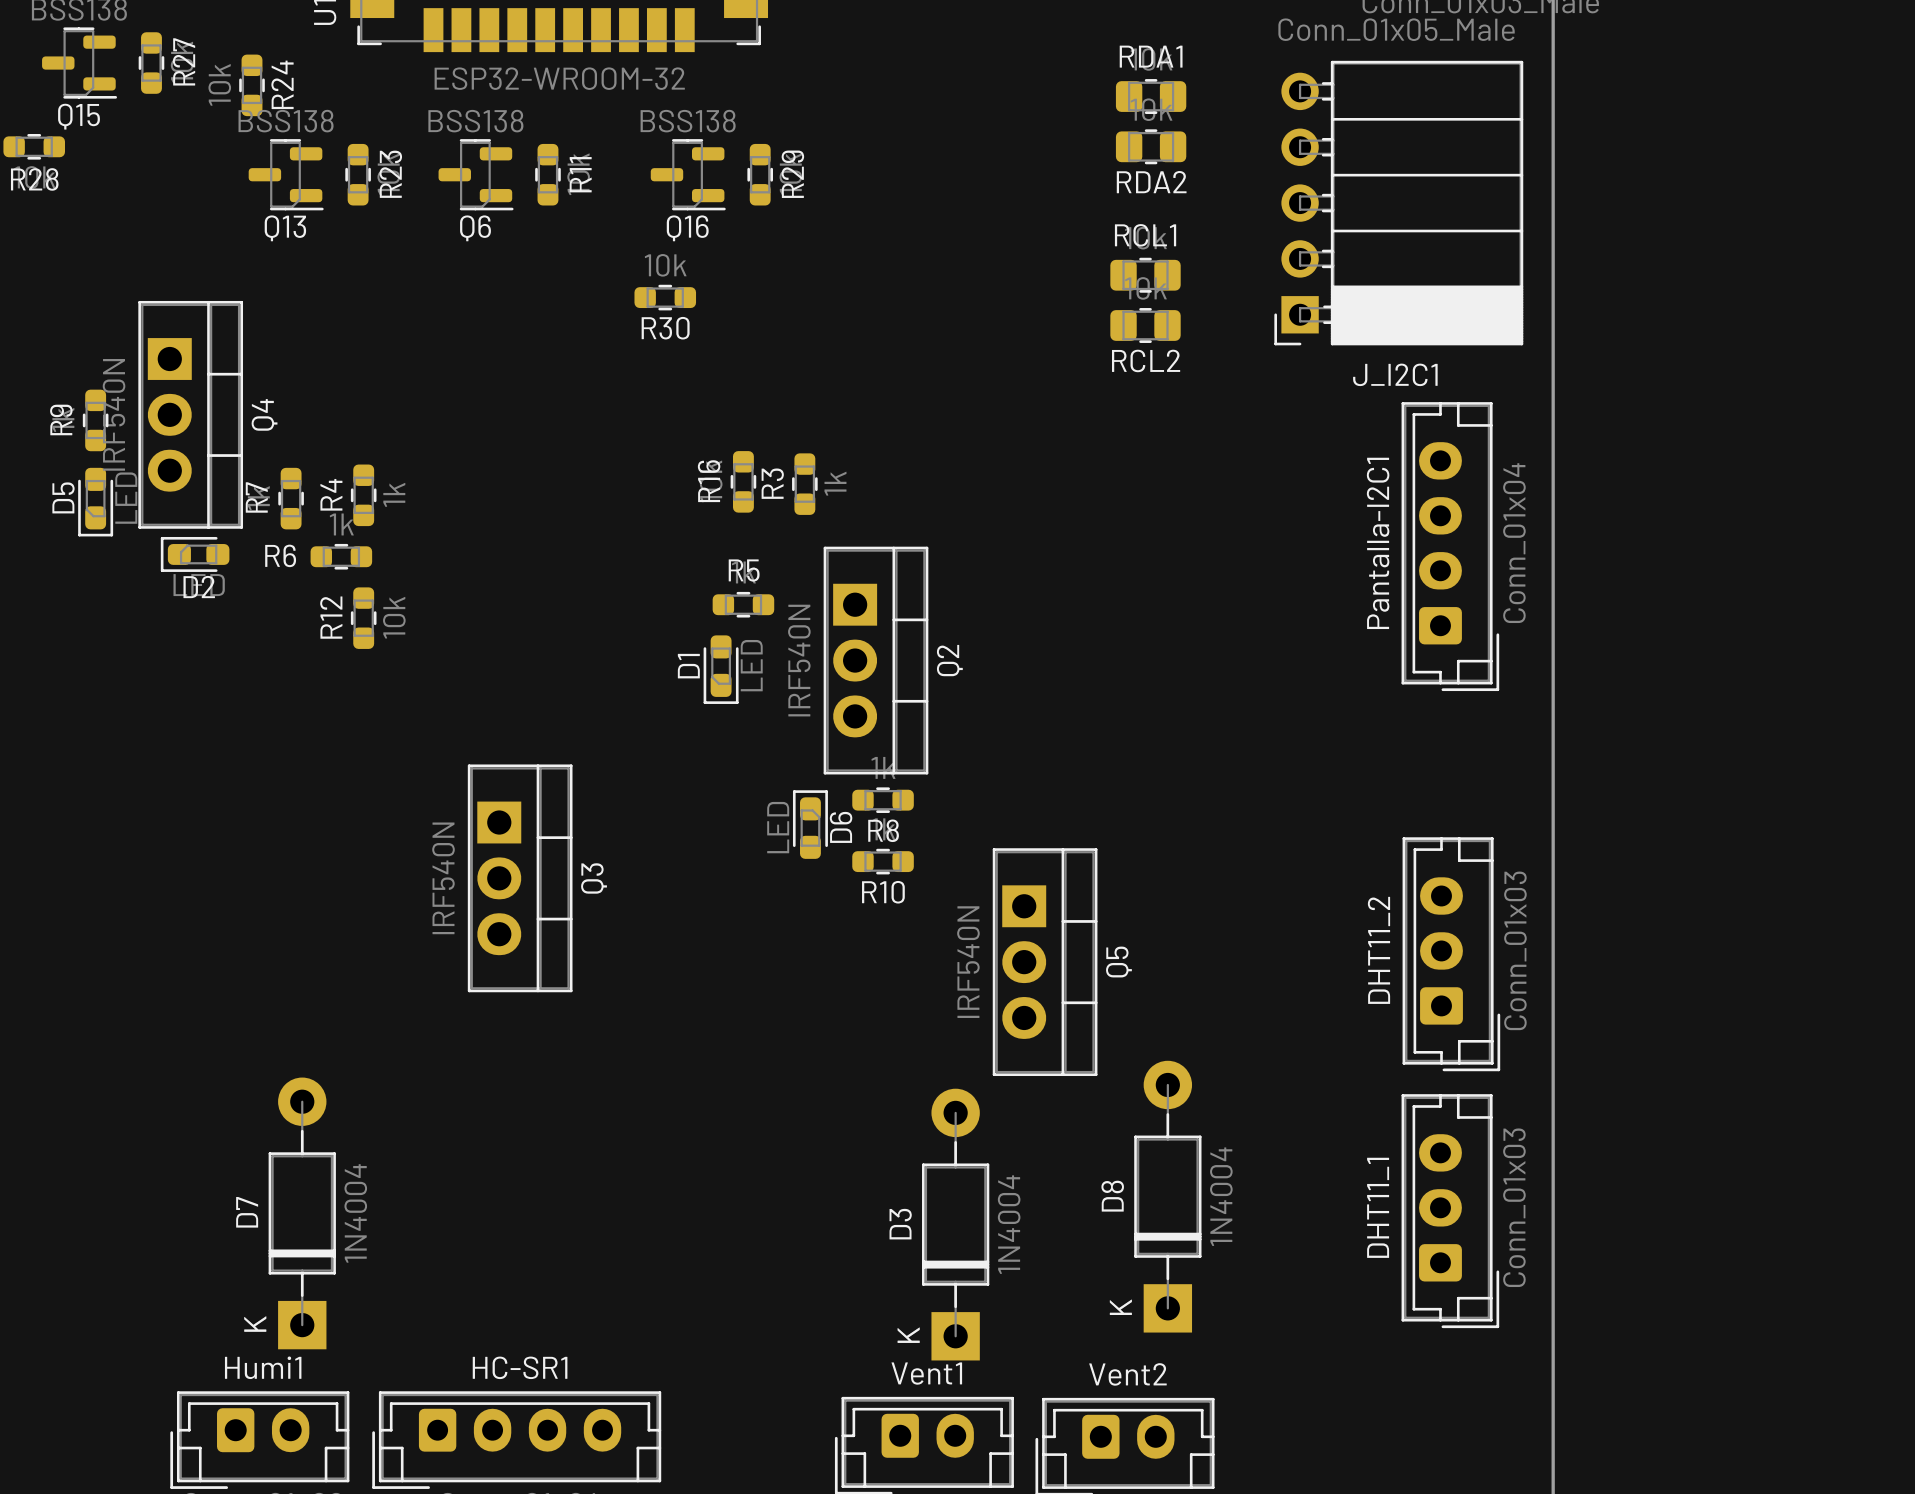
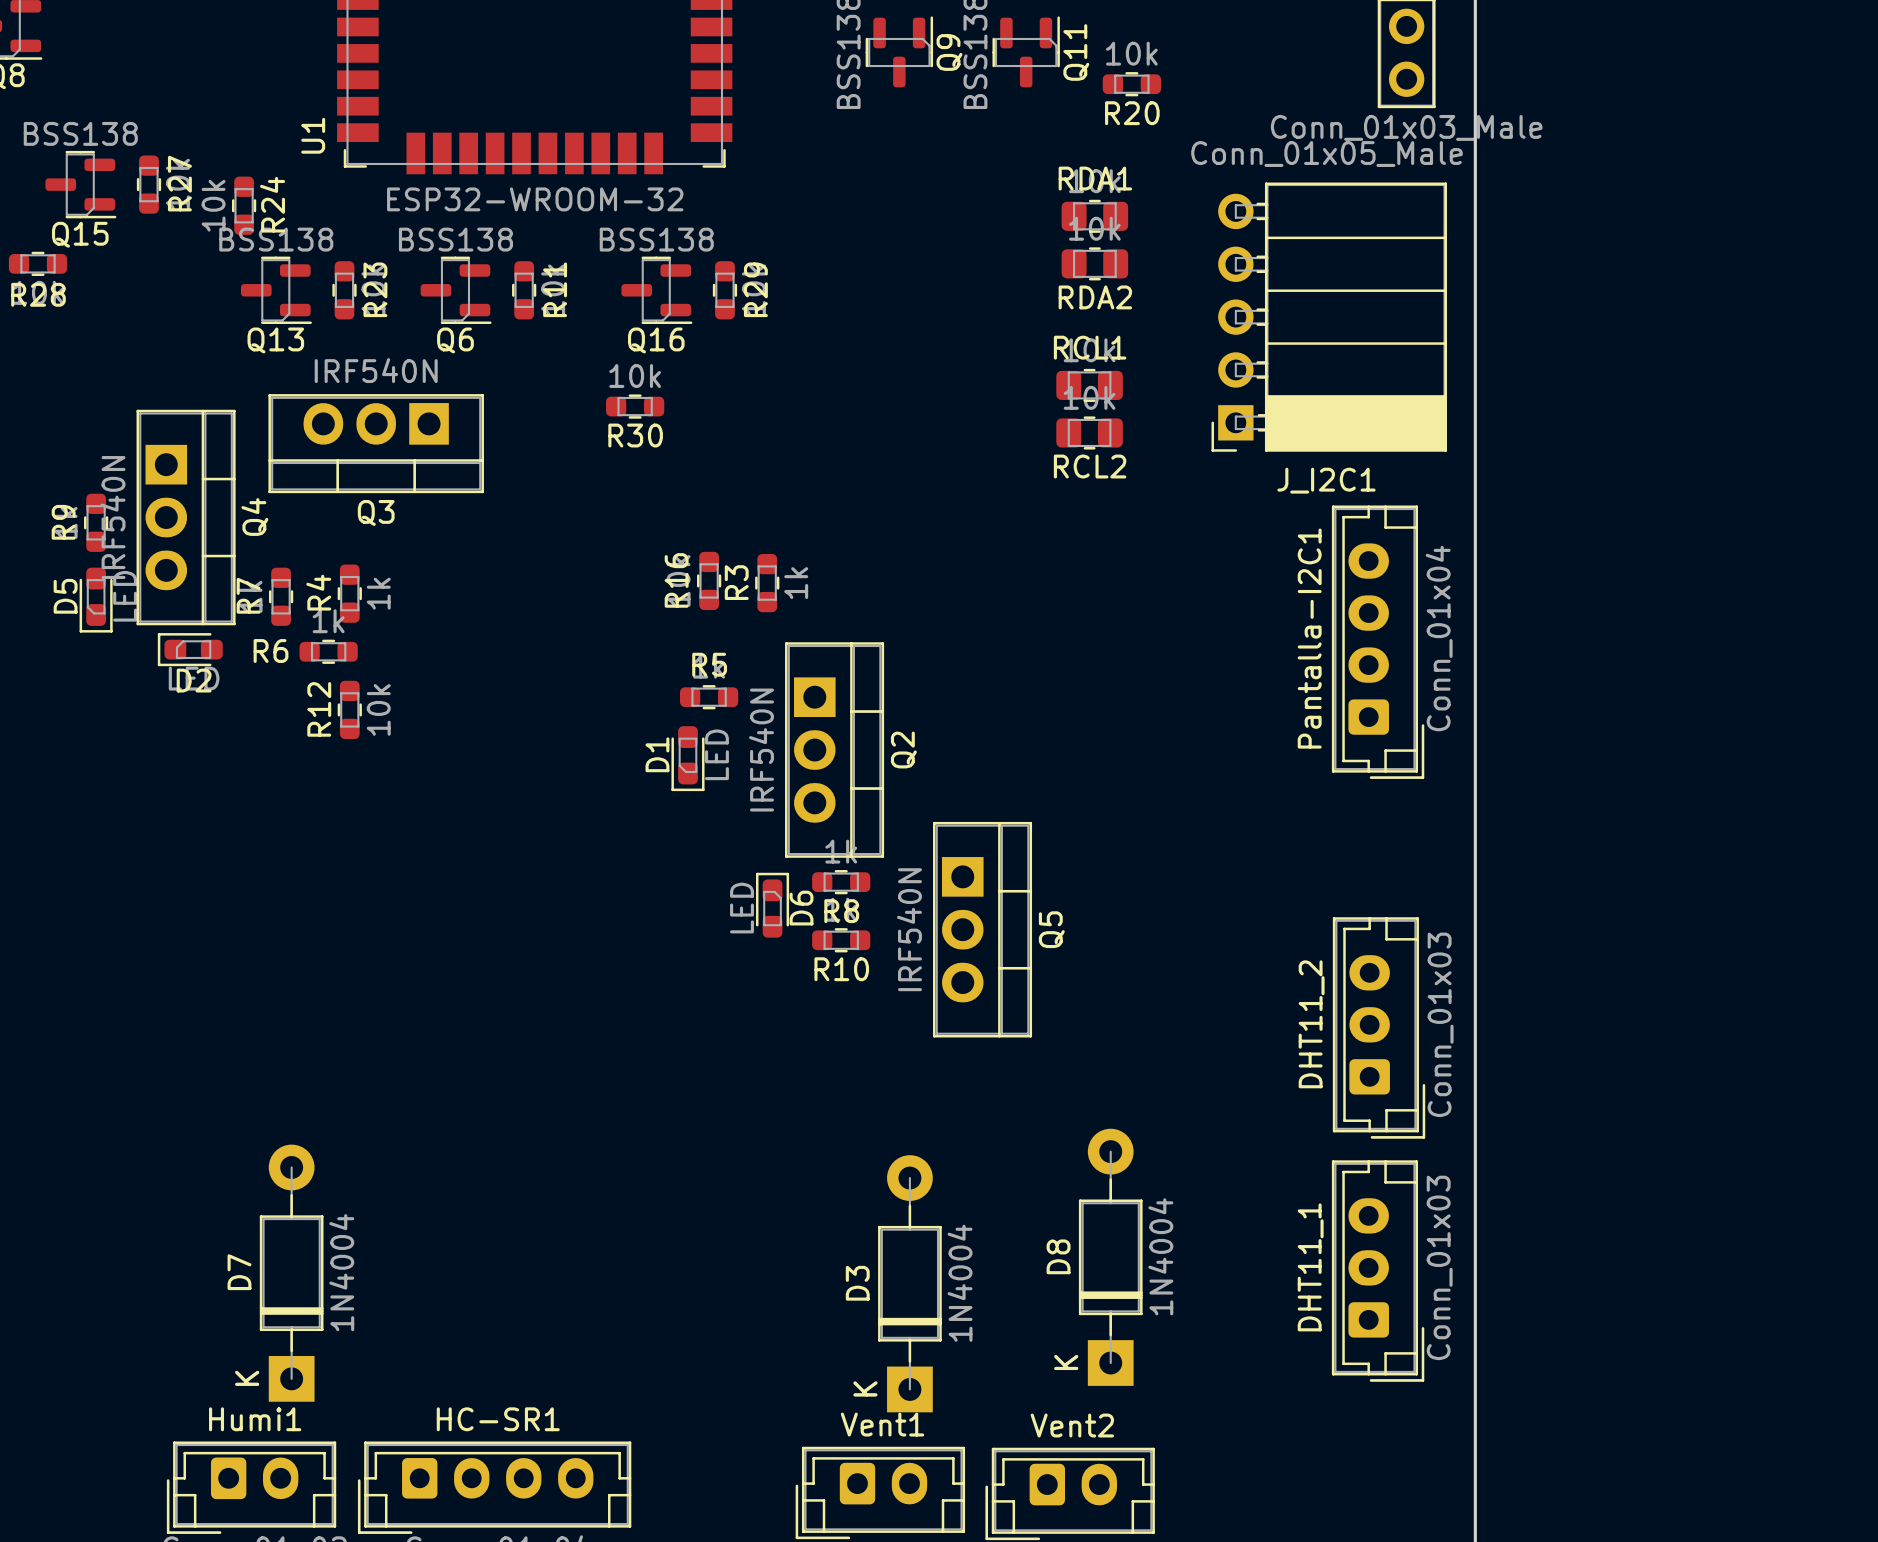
Q3 rotation: 0° (520, 878) -> 90° clockwise (376, 443)
Q3 position: (520, 878) -> (376, 443)
Q5 position: (1045, 962) -> (982, 929)

